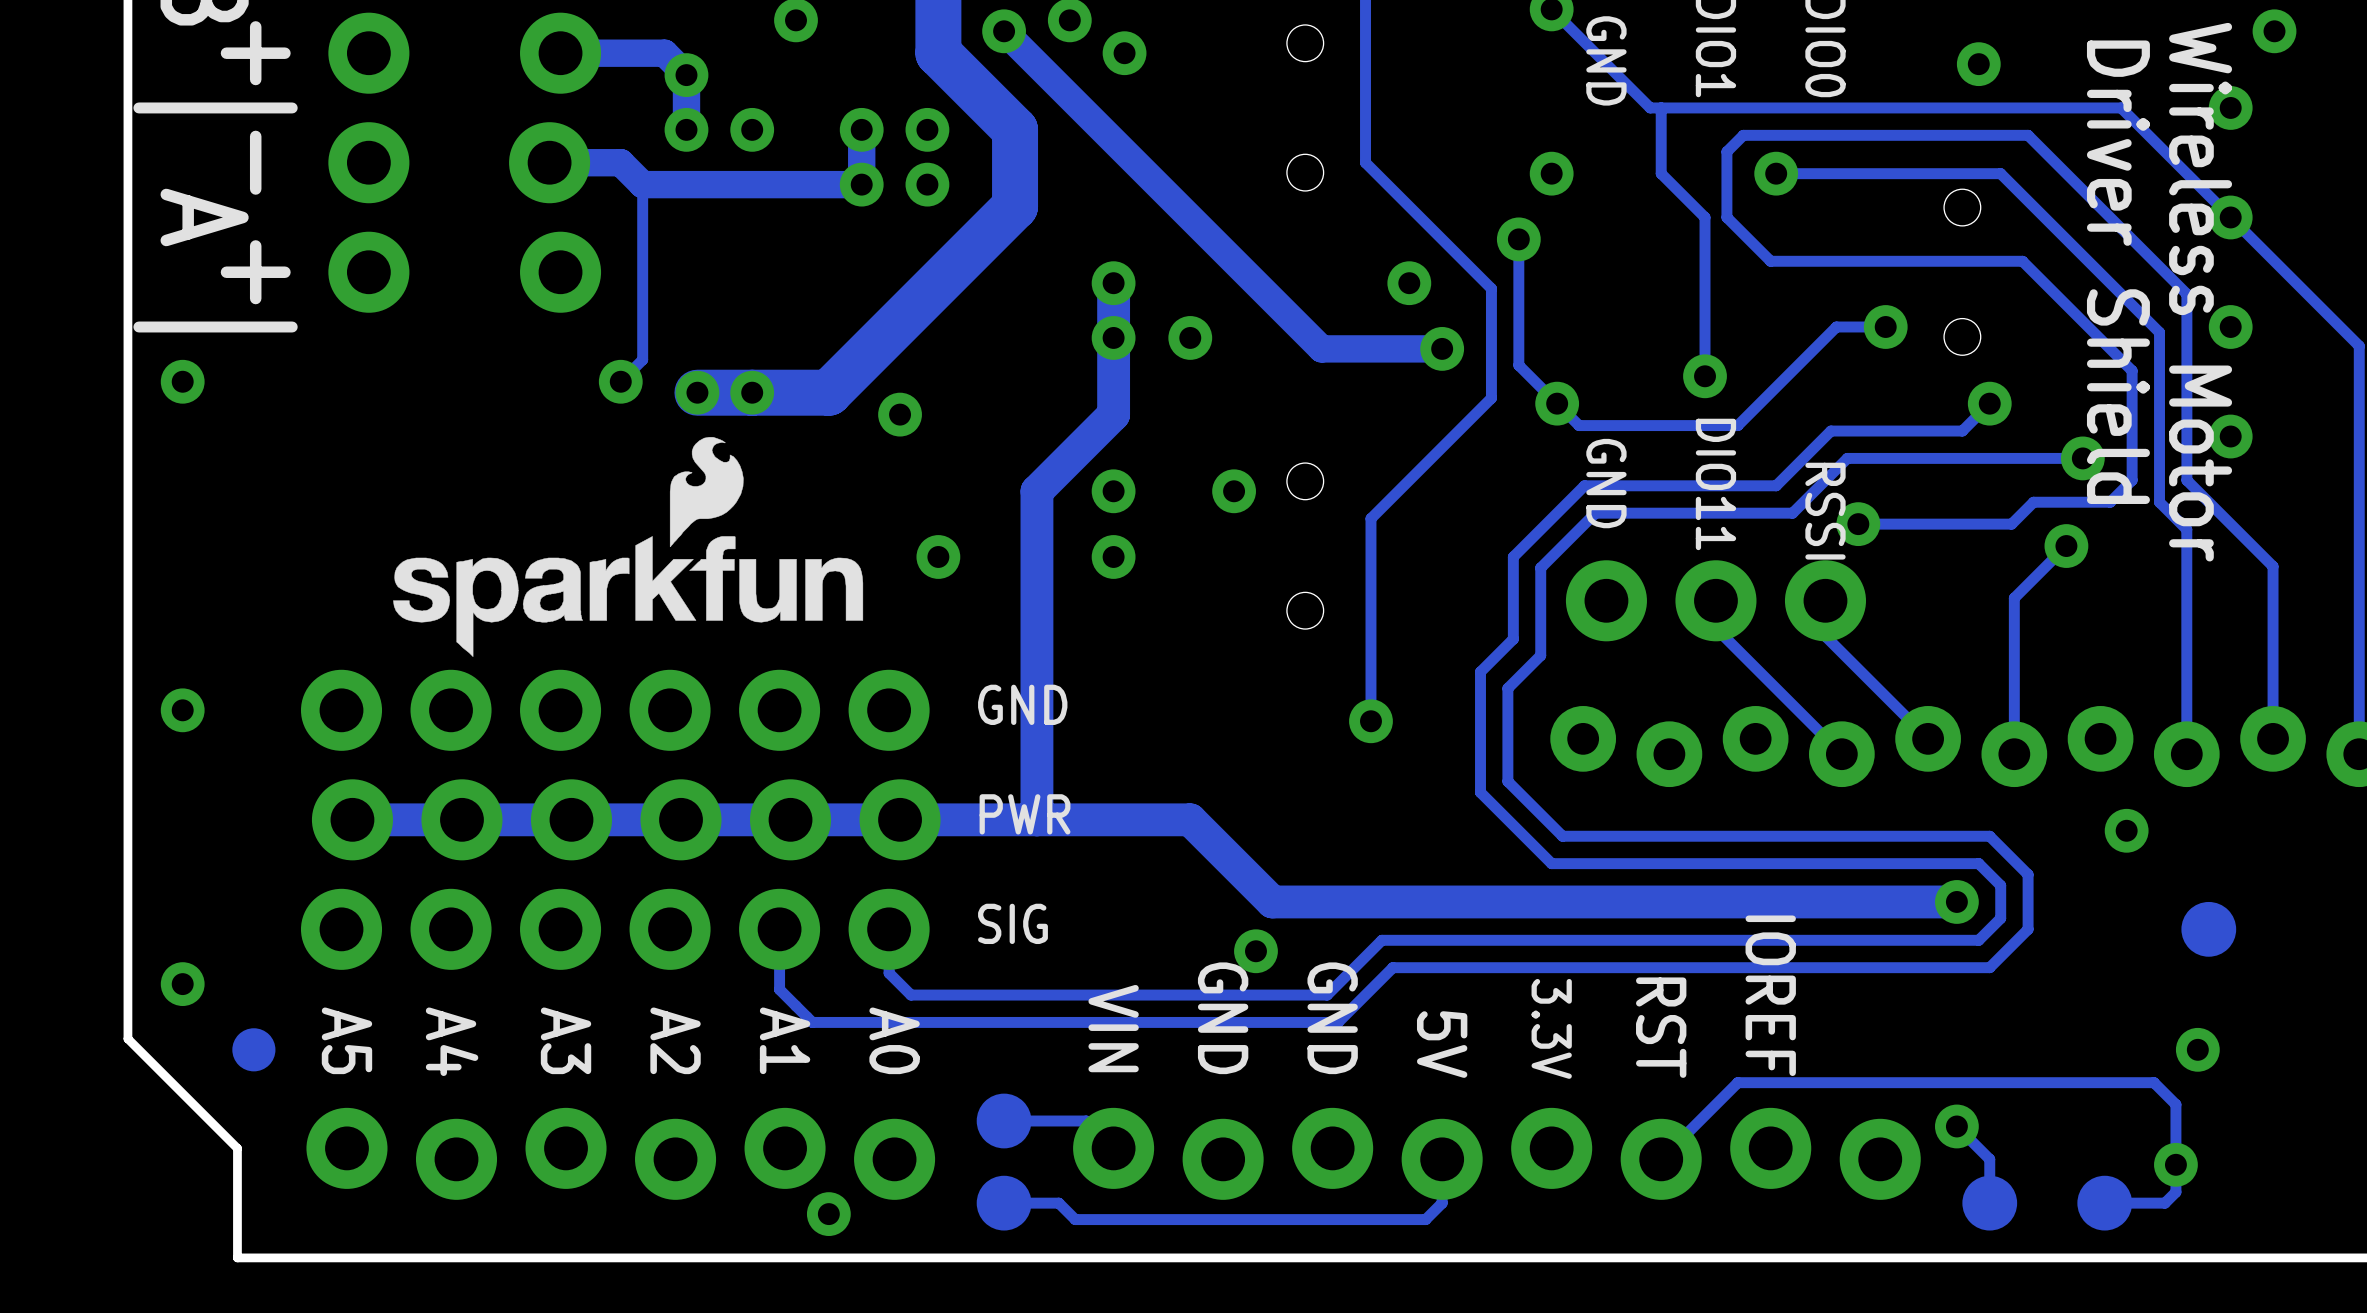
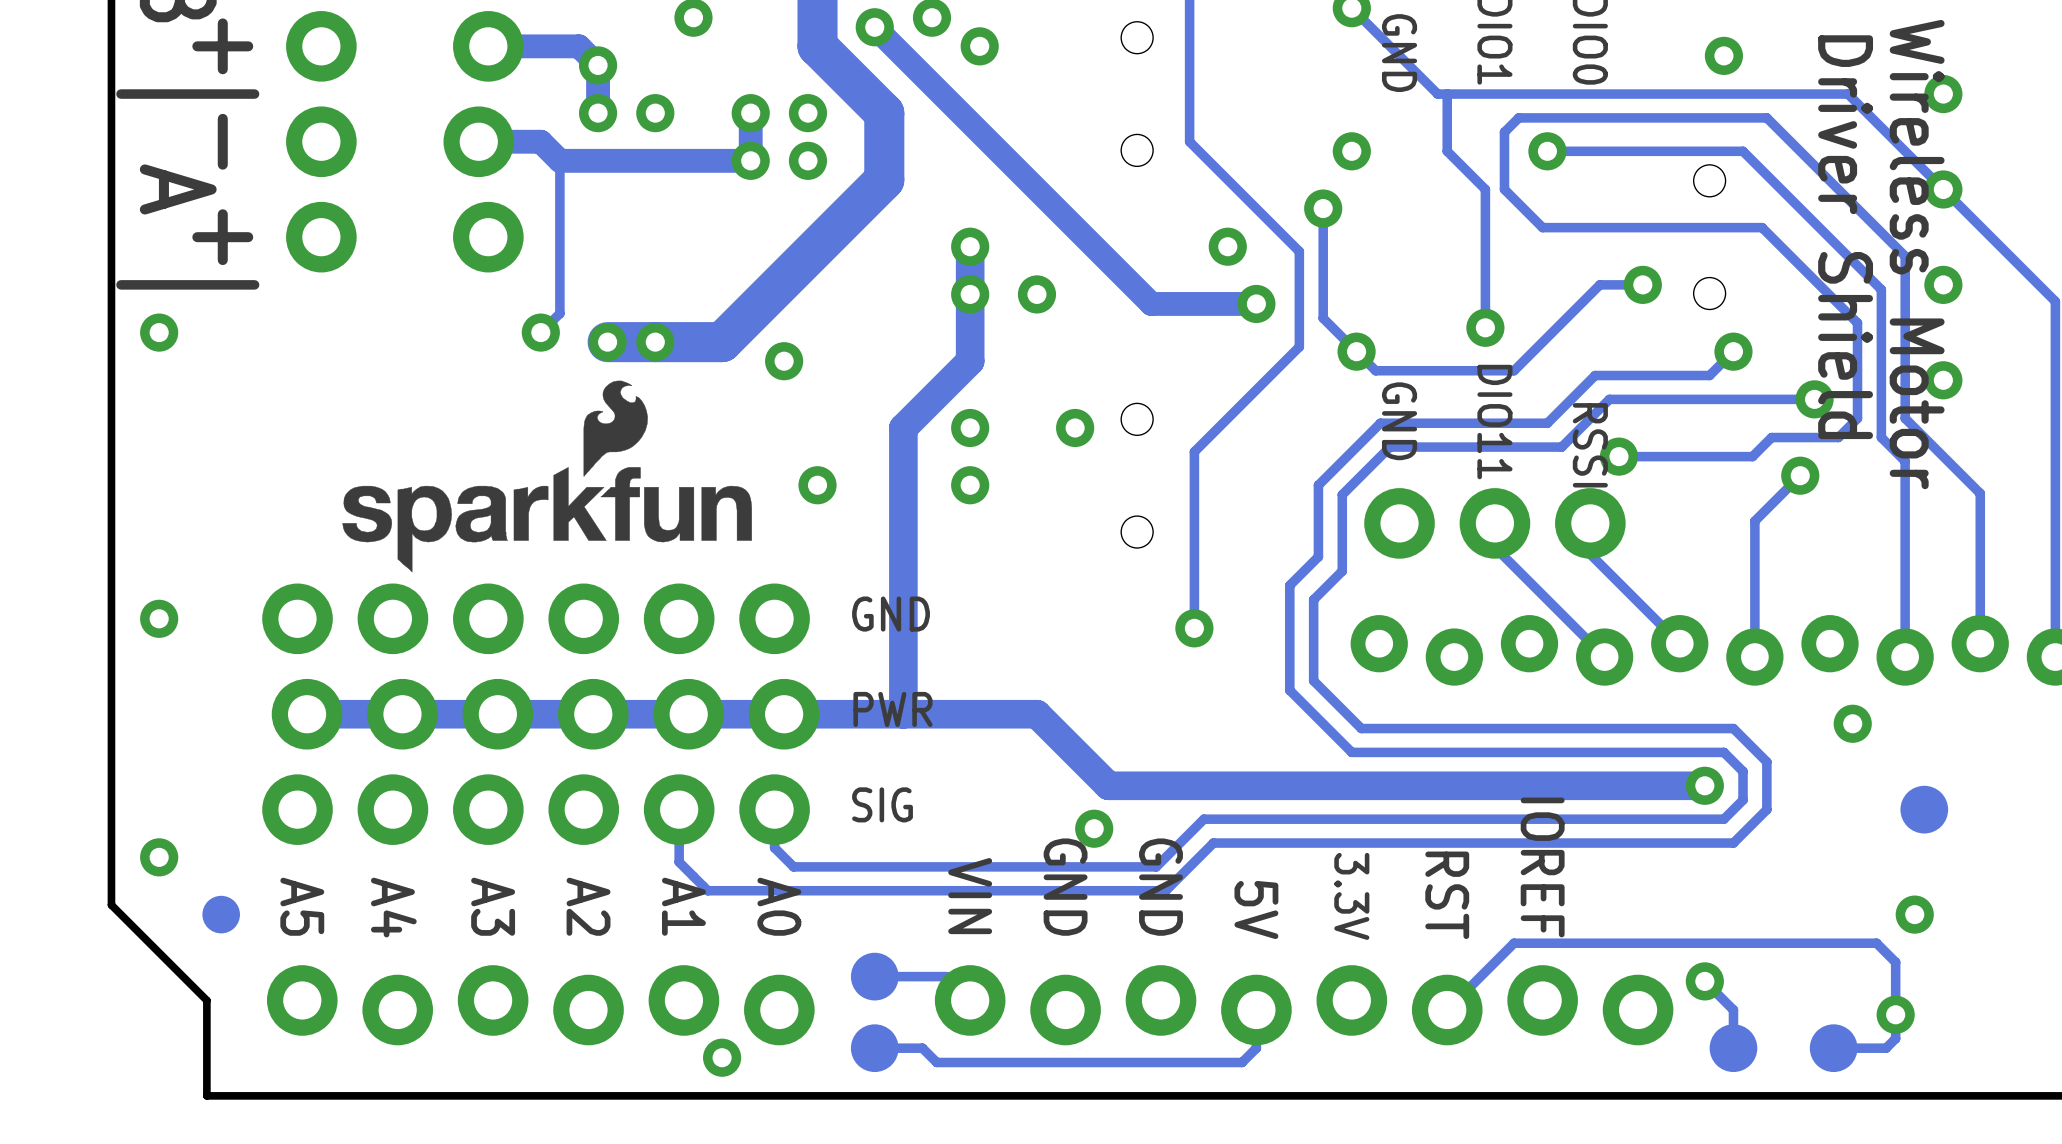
via: (2274, 31) -> none

